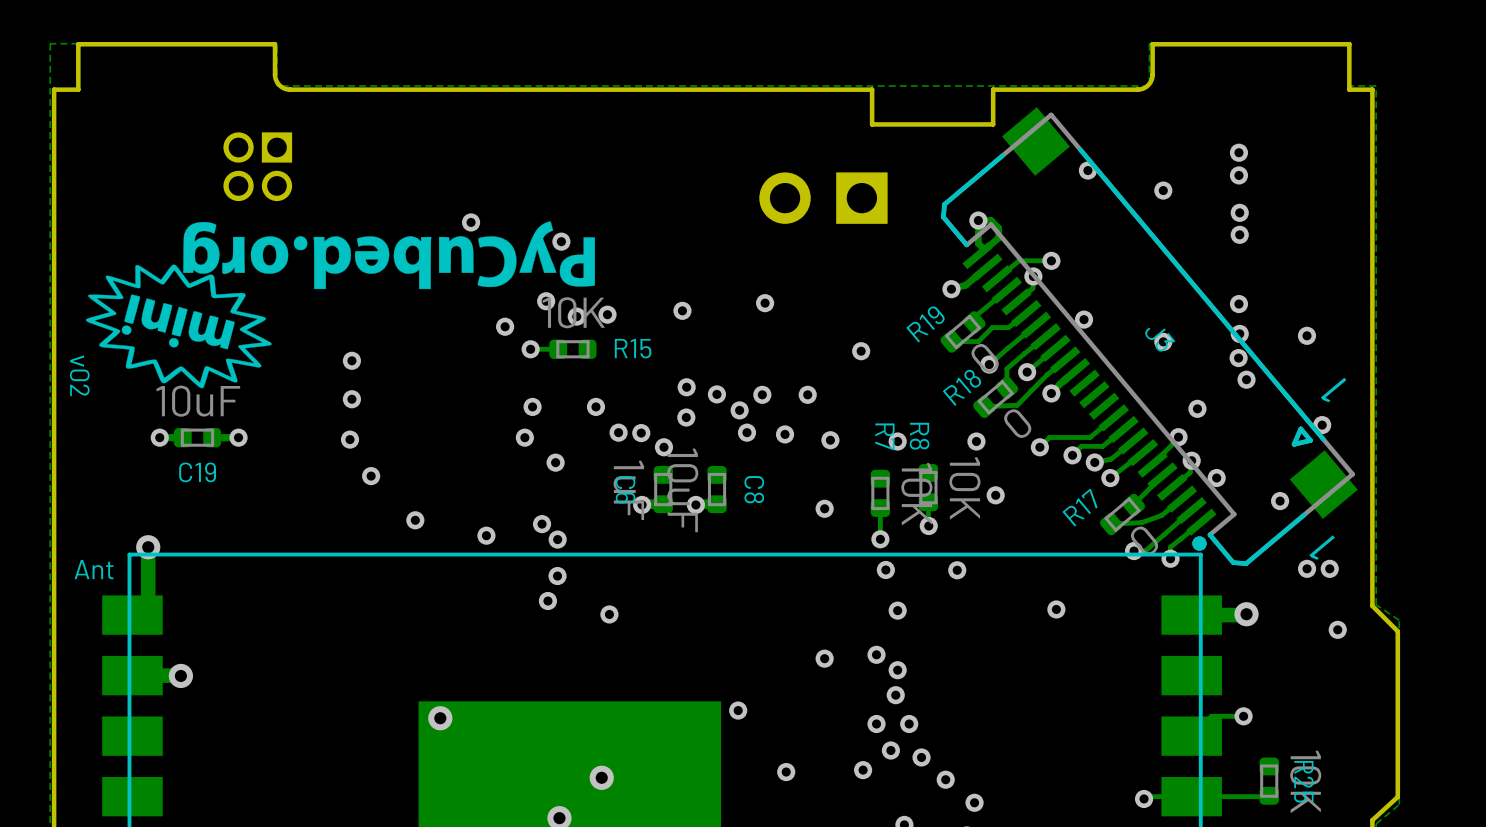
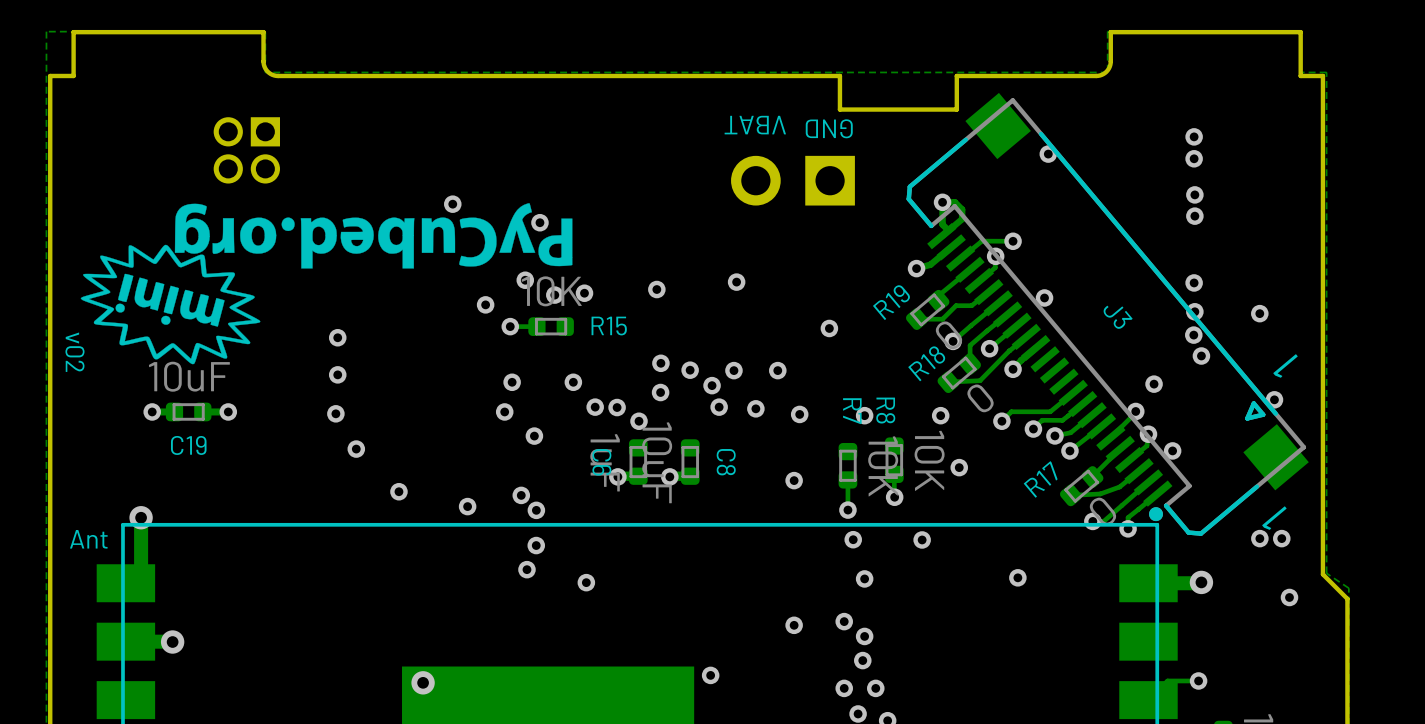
text: none -> VBAT (755, 125)
text: none -> GND (829, 128)
via: (1163, 190) -> none
via: (1163, 341) -> none
via: (1280, 501) -> none

